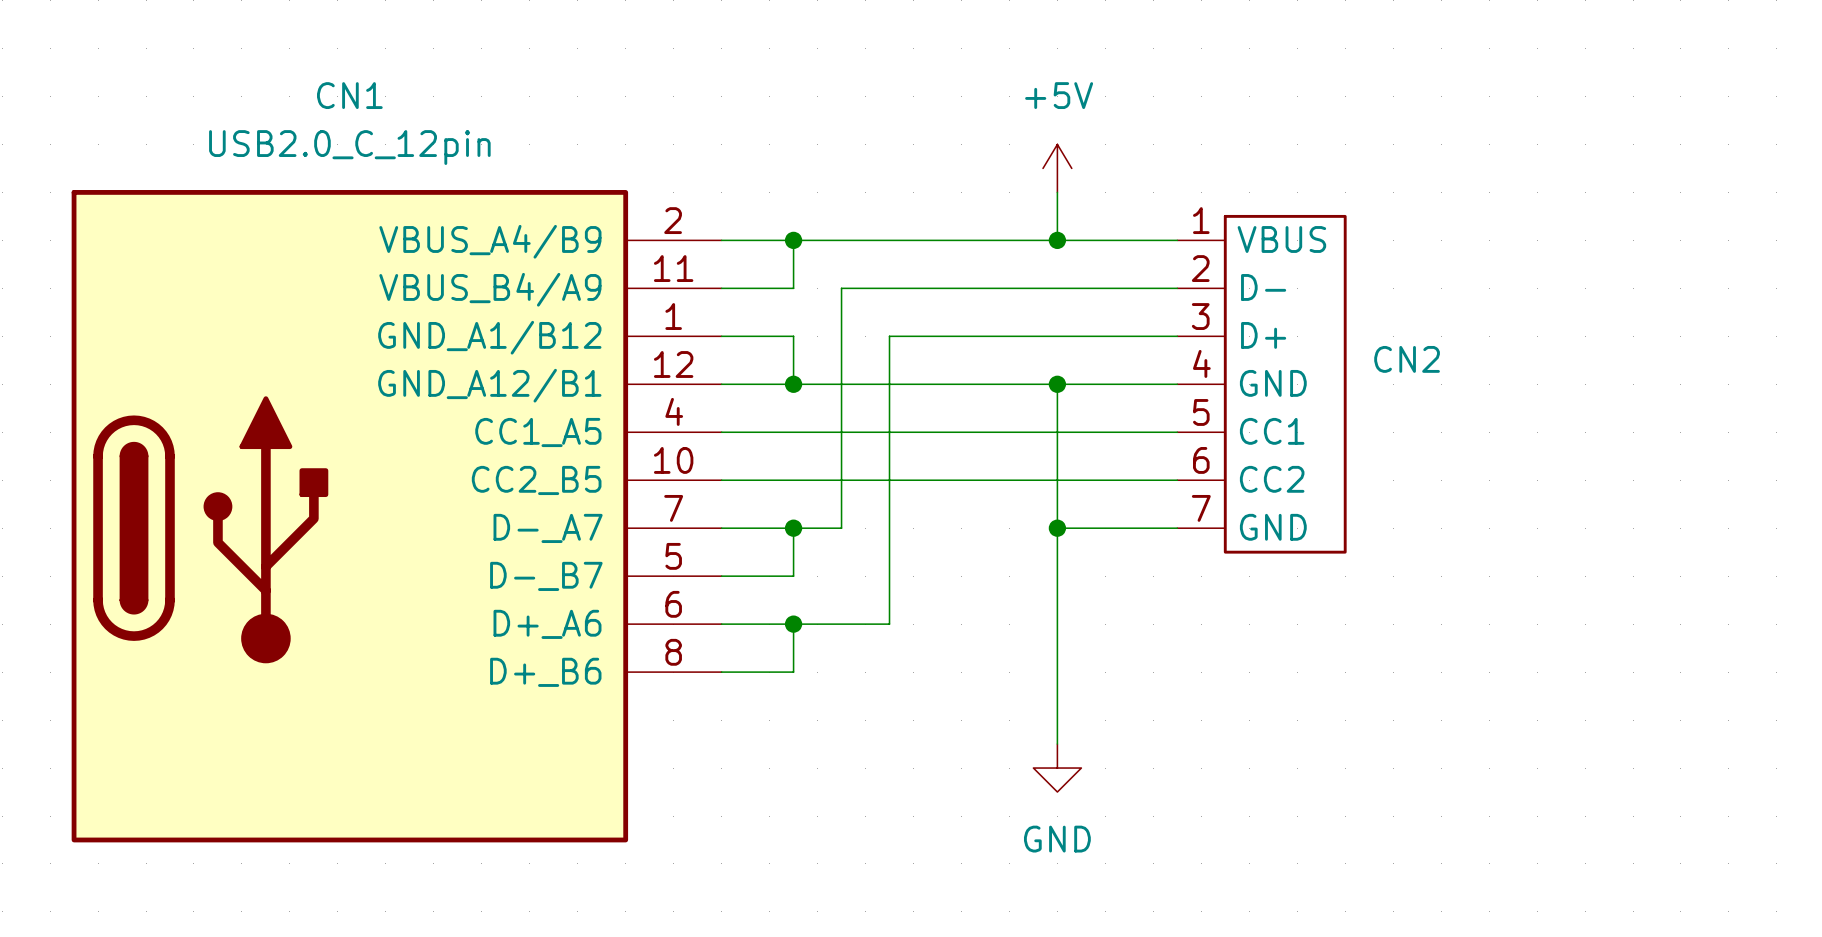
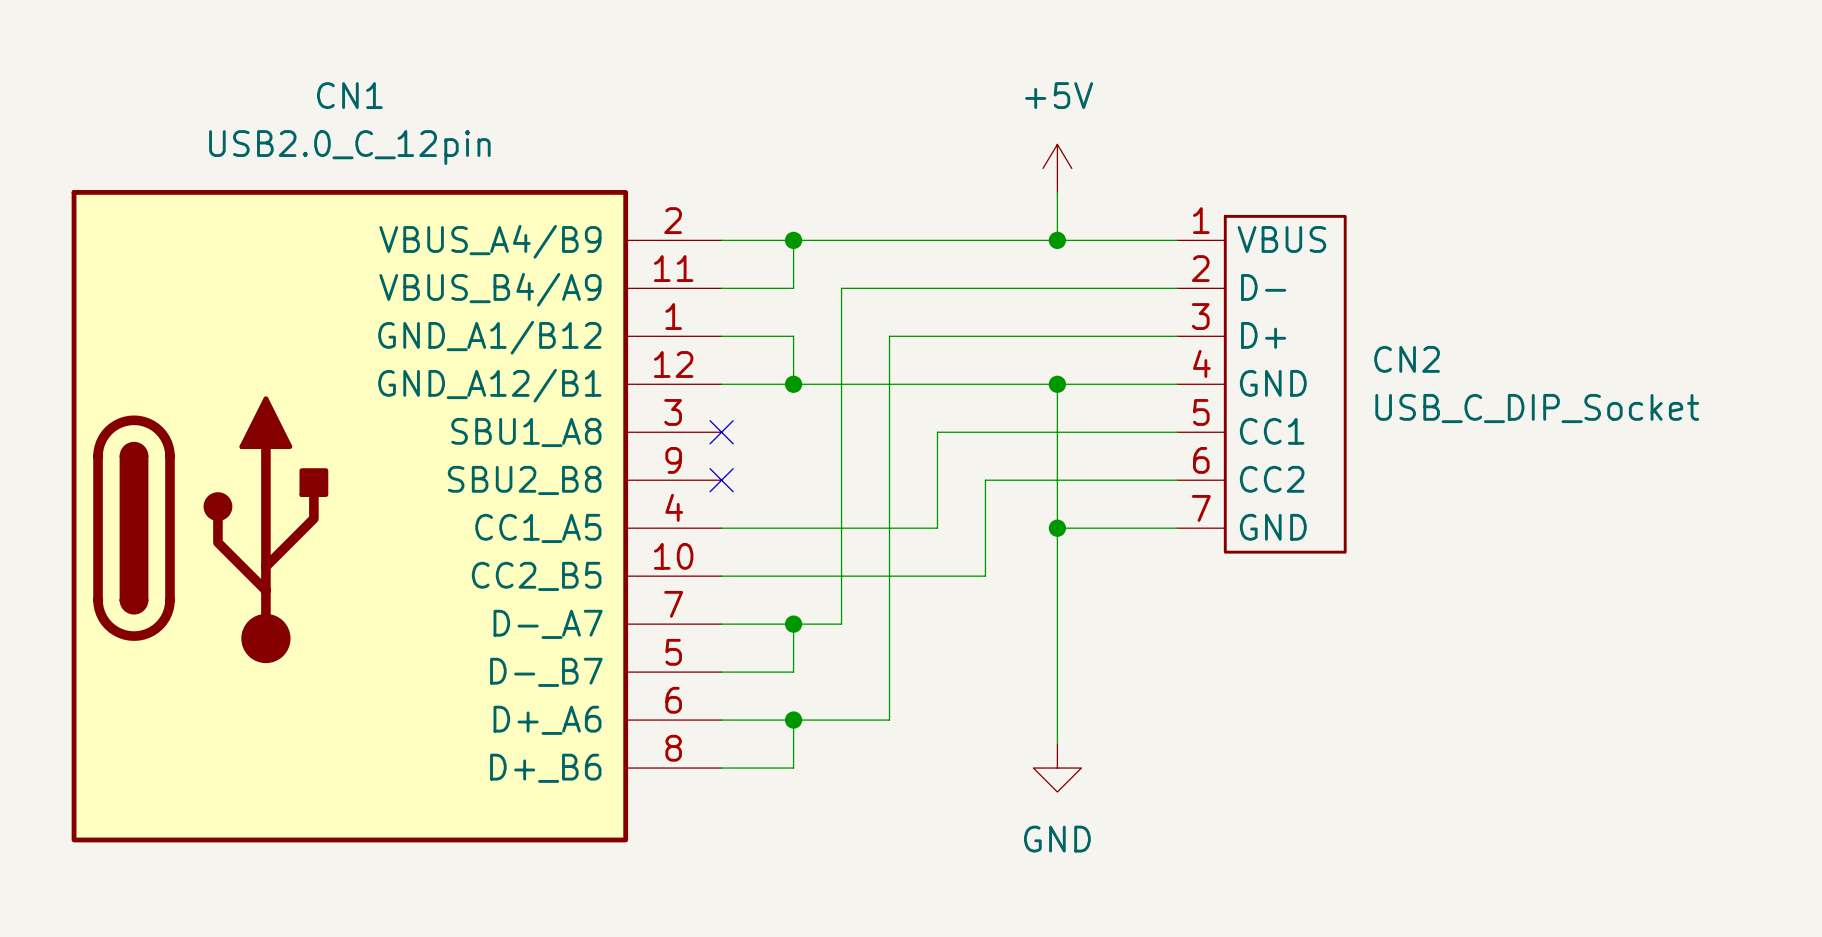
CN1 symbol: [71, 190, 722, 843] -> [71, 190, 722, 843]
CN2 value: none -> USB_C_DIP_Socket (1537, 408)
wire: (721, 432) (937, 432) -> (841, 624) (841, 528) (937, 528) (937, 432)
no-connect mark: none -> (721, 432)
wire: (721, 480) (985, 480) -> (793, 576) (985, 576) (985, 480)
no-connect mark: none -> (721, 480)
wire: (793, 528) (793, 576) -> none
junction: (793, 528) -> none
wire: (841, 624) (889, 624) -> (721, 720) (889, 720) (889, 624)
wire: none -> (793, 720) (793, 768) (721, 768)
junction: none -> (793, 720)

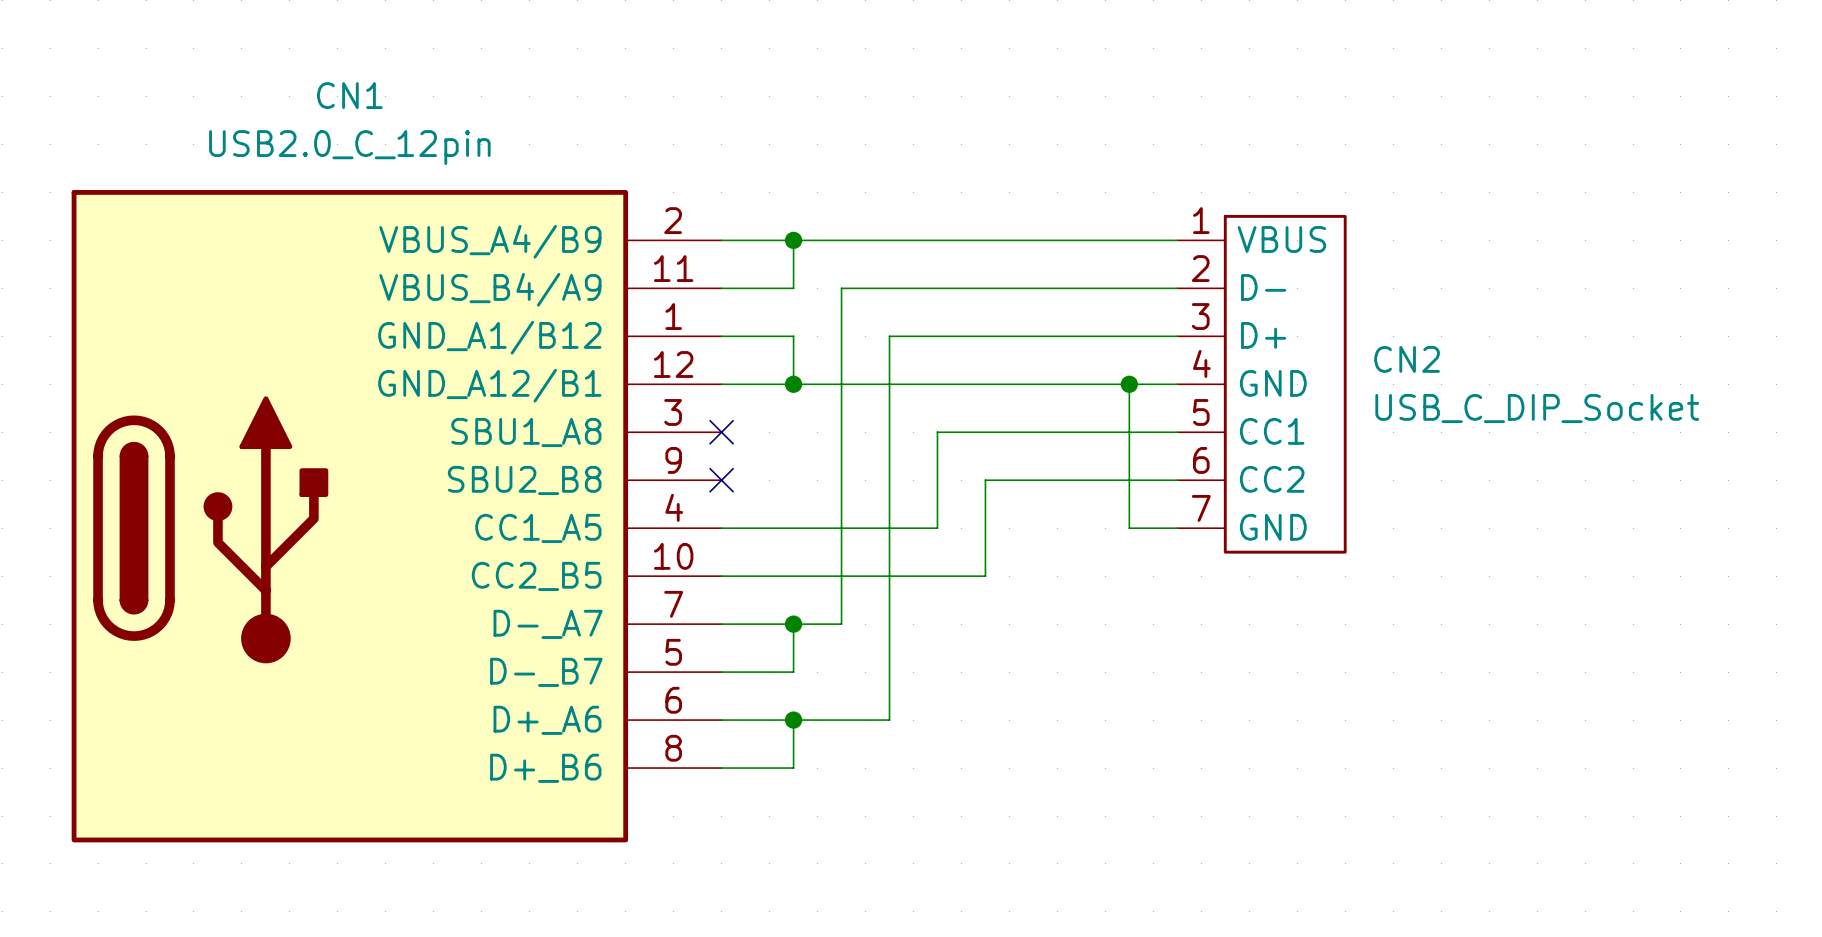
power symbol: +5V (1057, 168) -> none
wire: (1057, 192) (1057, 240) -> none
junction: (1057, 240) -> none
wire: (1057, 384) (1057, 744) -> none
junction position: (1057, 384) -> (1129, 384)
wire: (1057, 528) (1129, 528) -> (1129, 384) (1129, 528)
junction: (1057, 528) -> none
power symbol: GND (1057, 768) -> none

